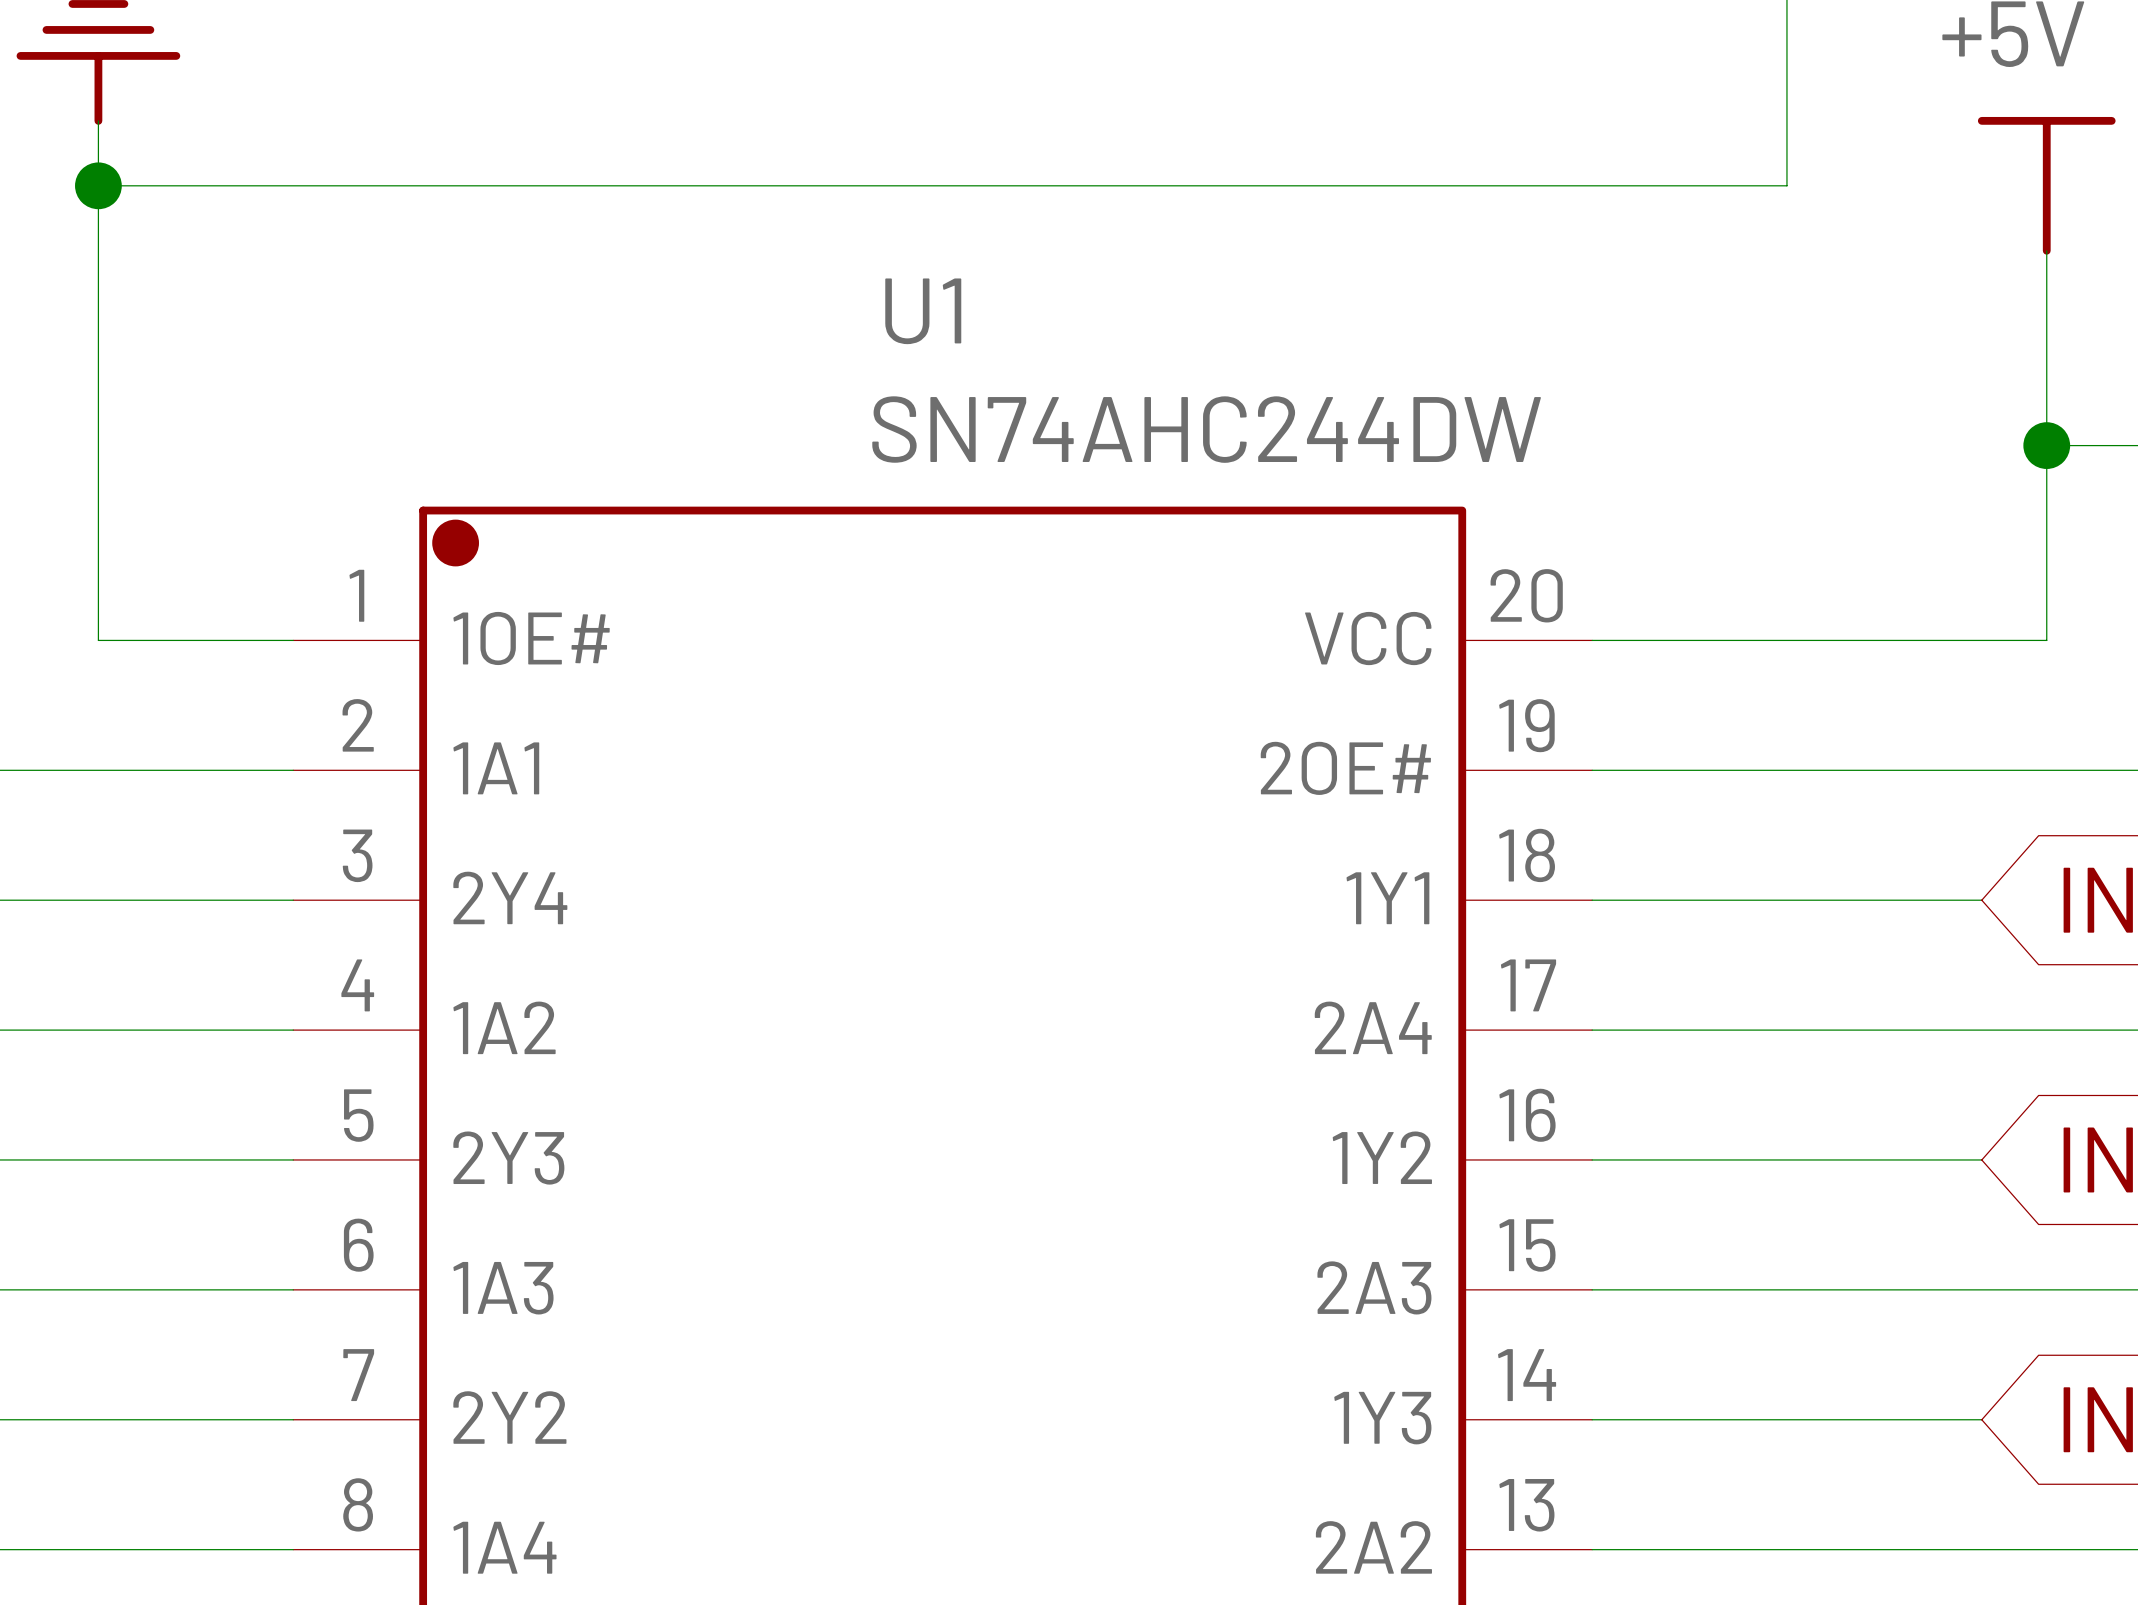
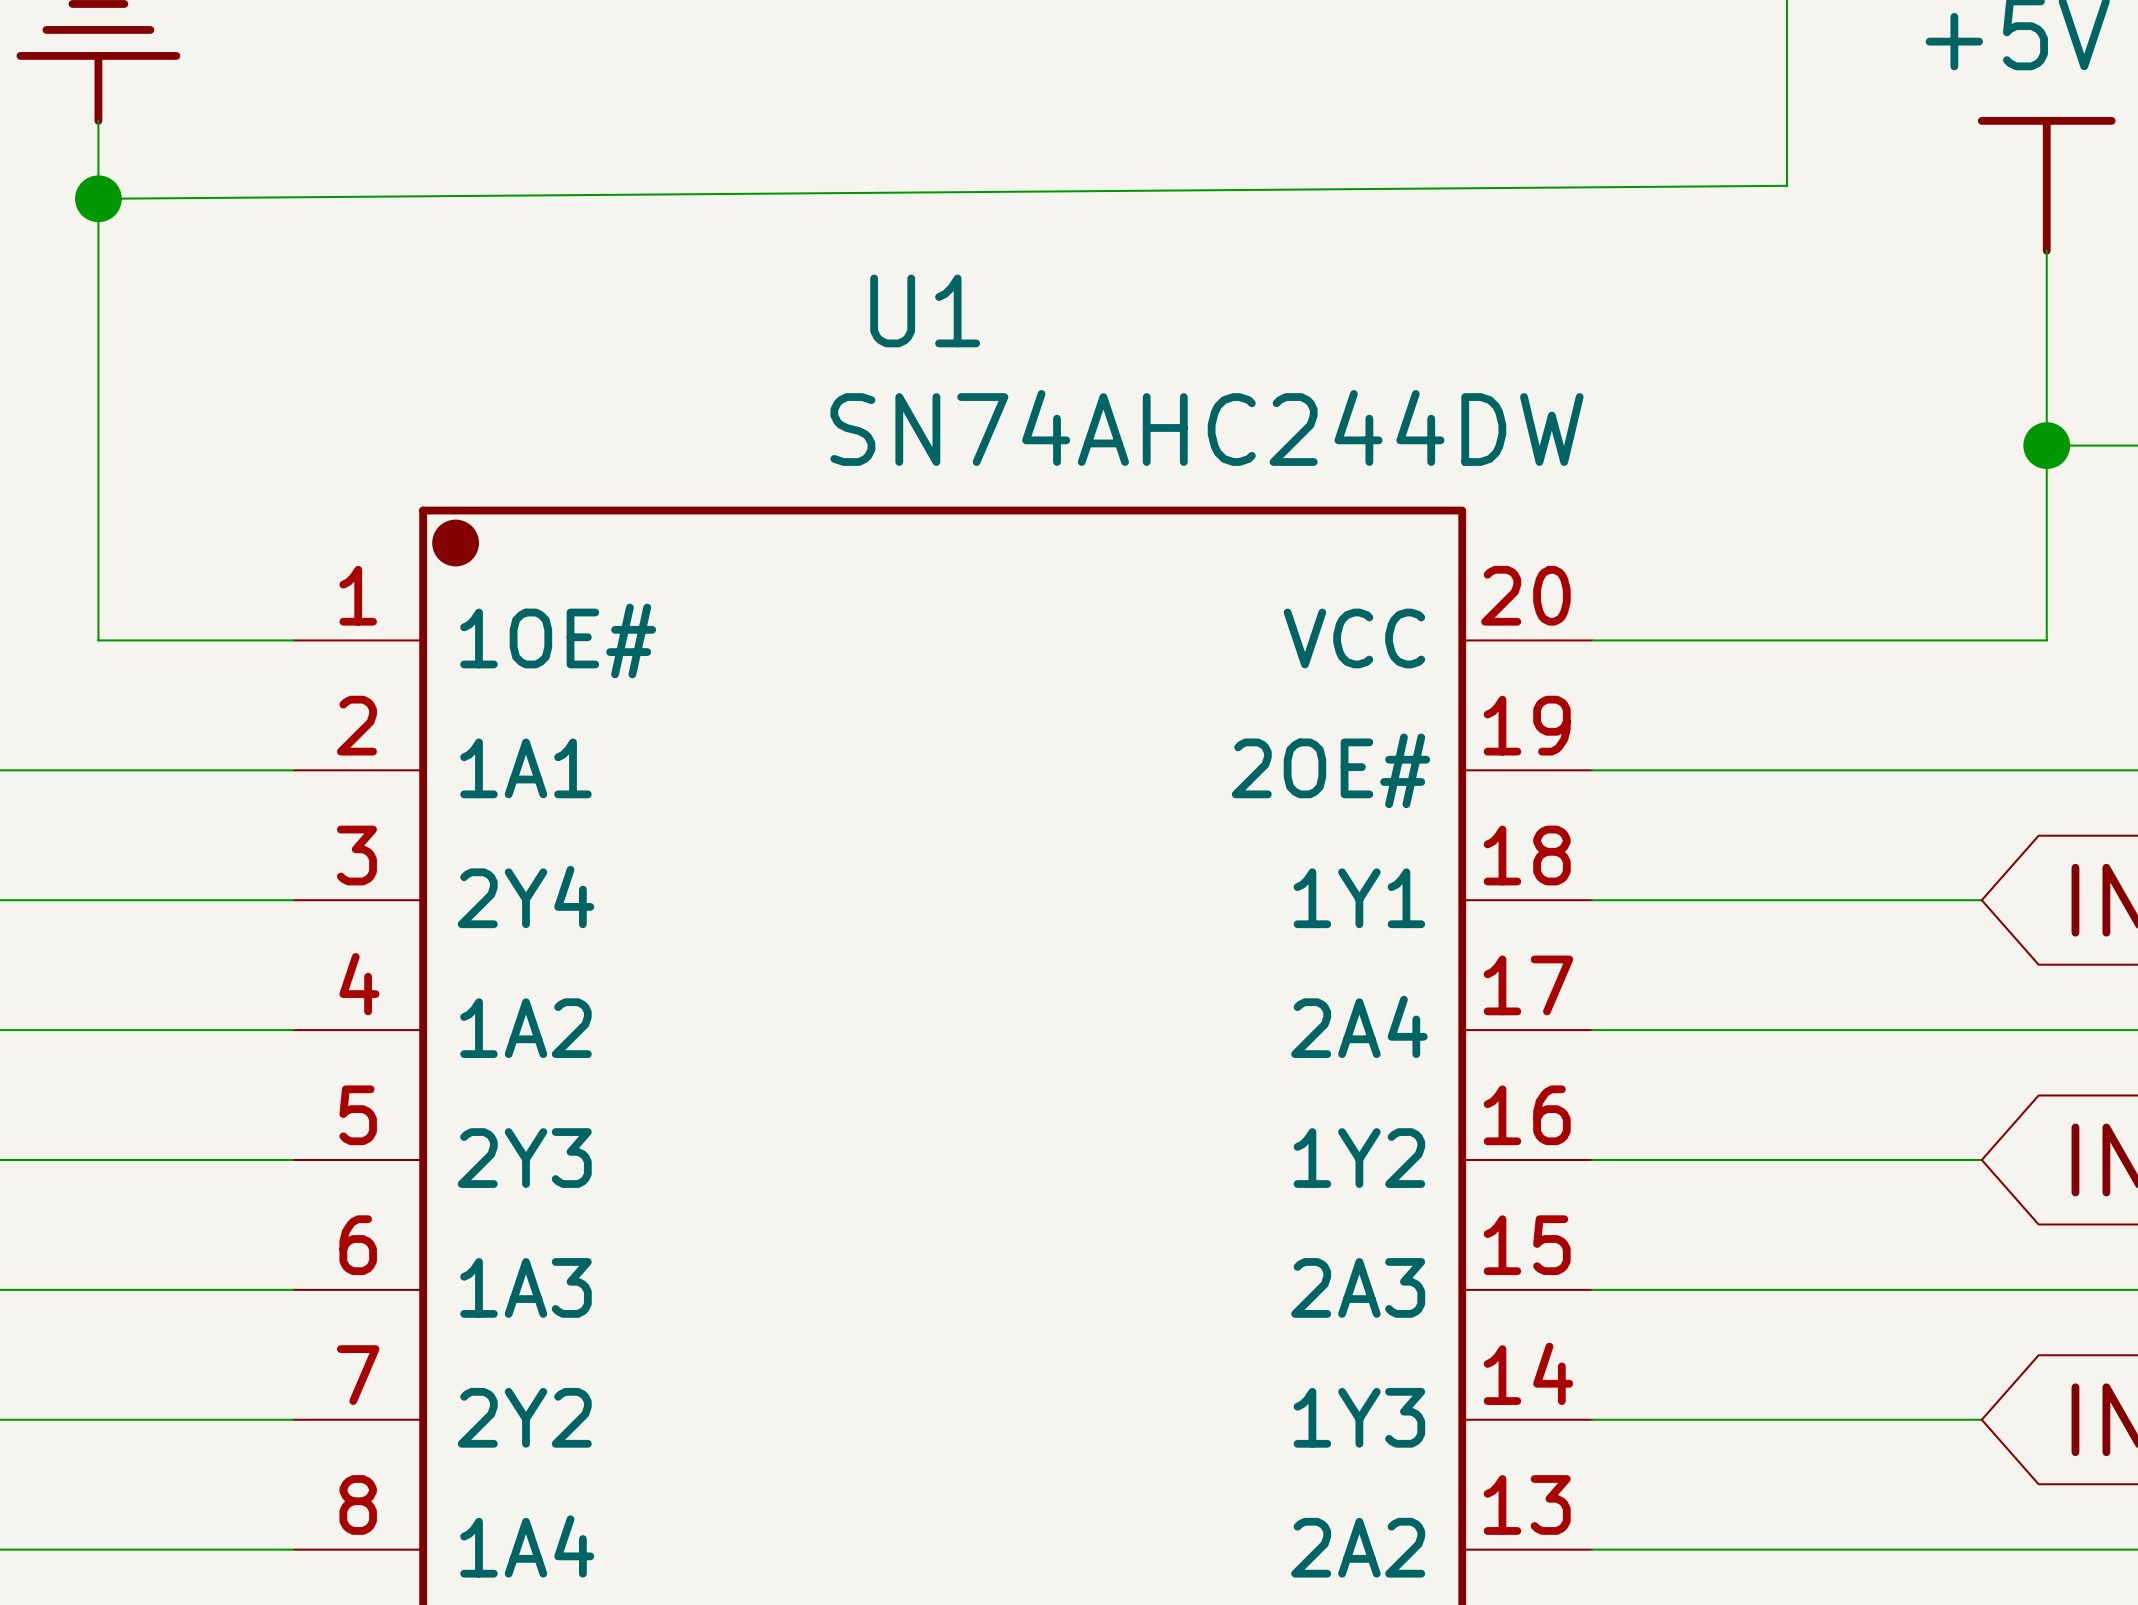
wire: (98, 185) (1786, 185) -> (98, 198) (1786, 185)
junction position: (98, 185) -> (98, 198)

